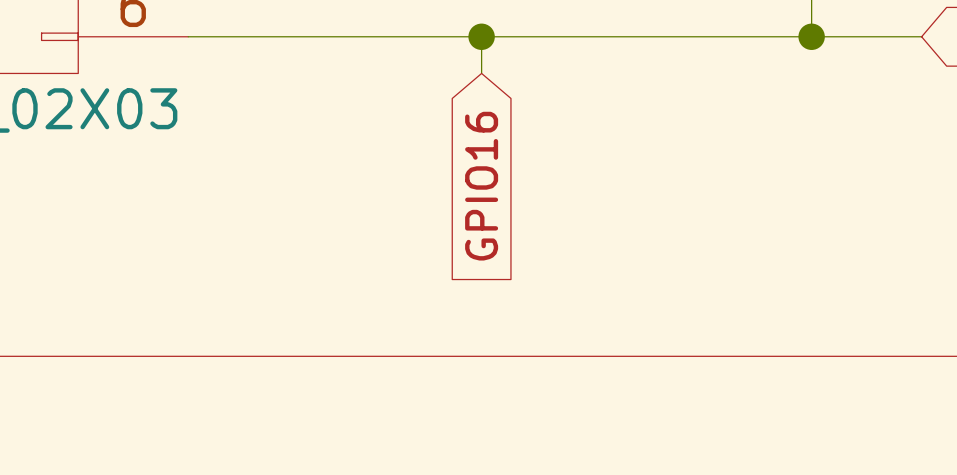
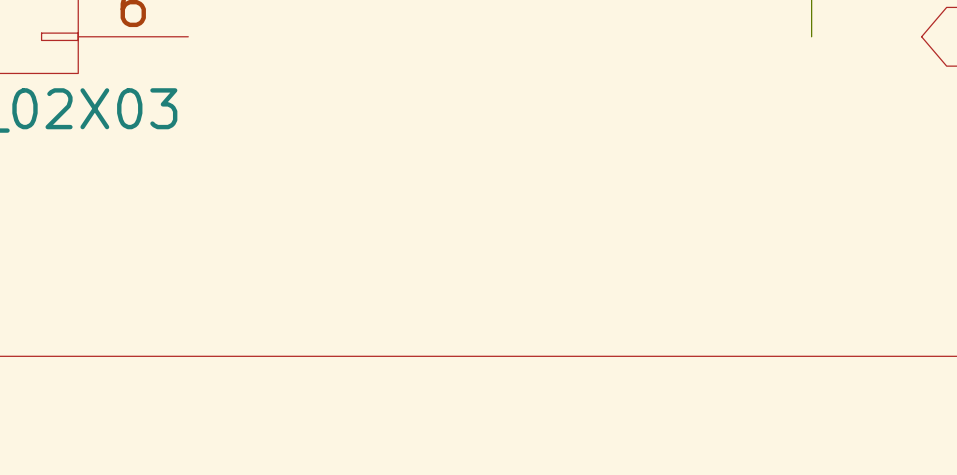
wire: (188, 36) (921, 36) -> none
wire: (481, 36) (481, 73) -> none
junction: (481, 36) -> none
junction: (811, 36) -> none
global label: GPIO16 (481, 186) -> none

